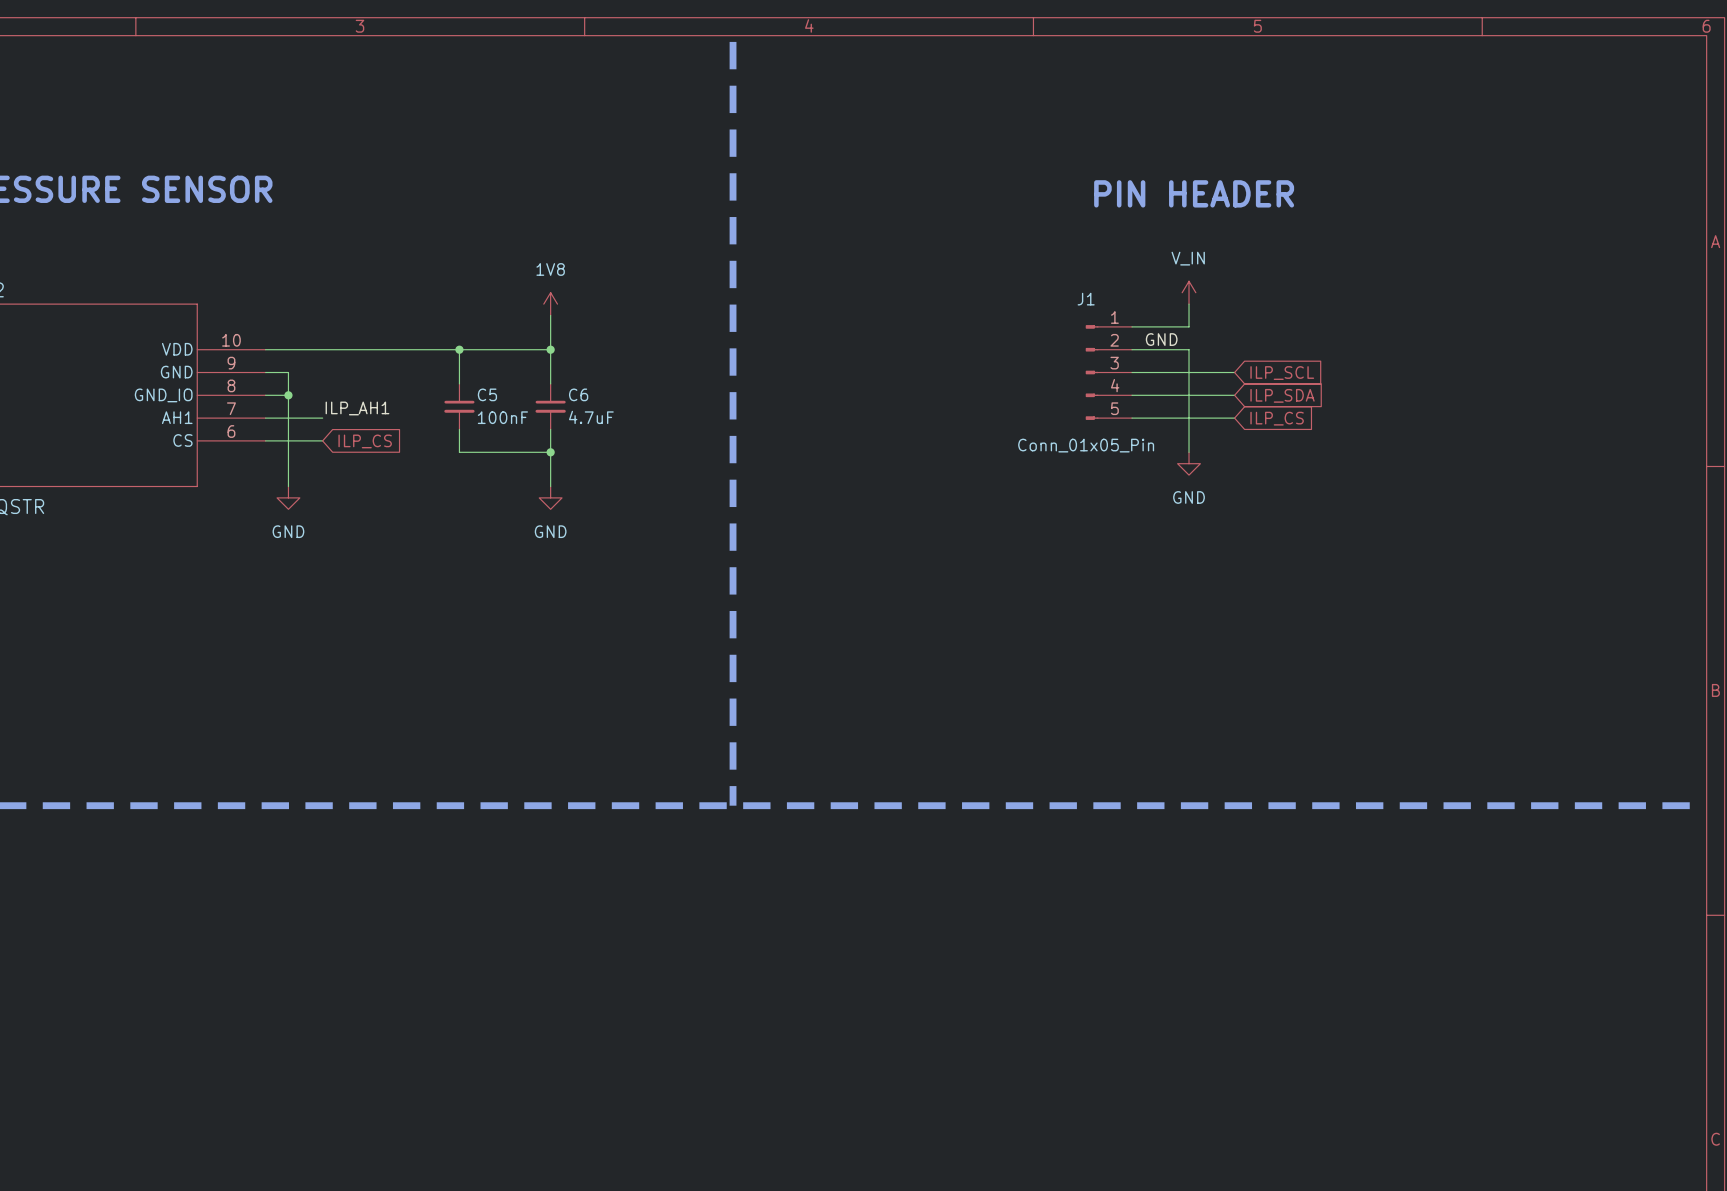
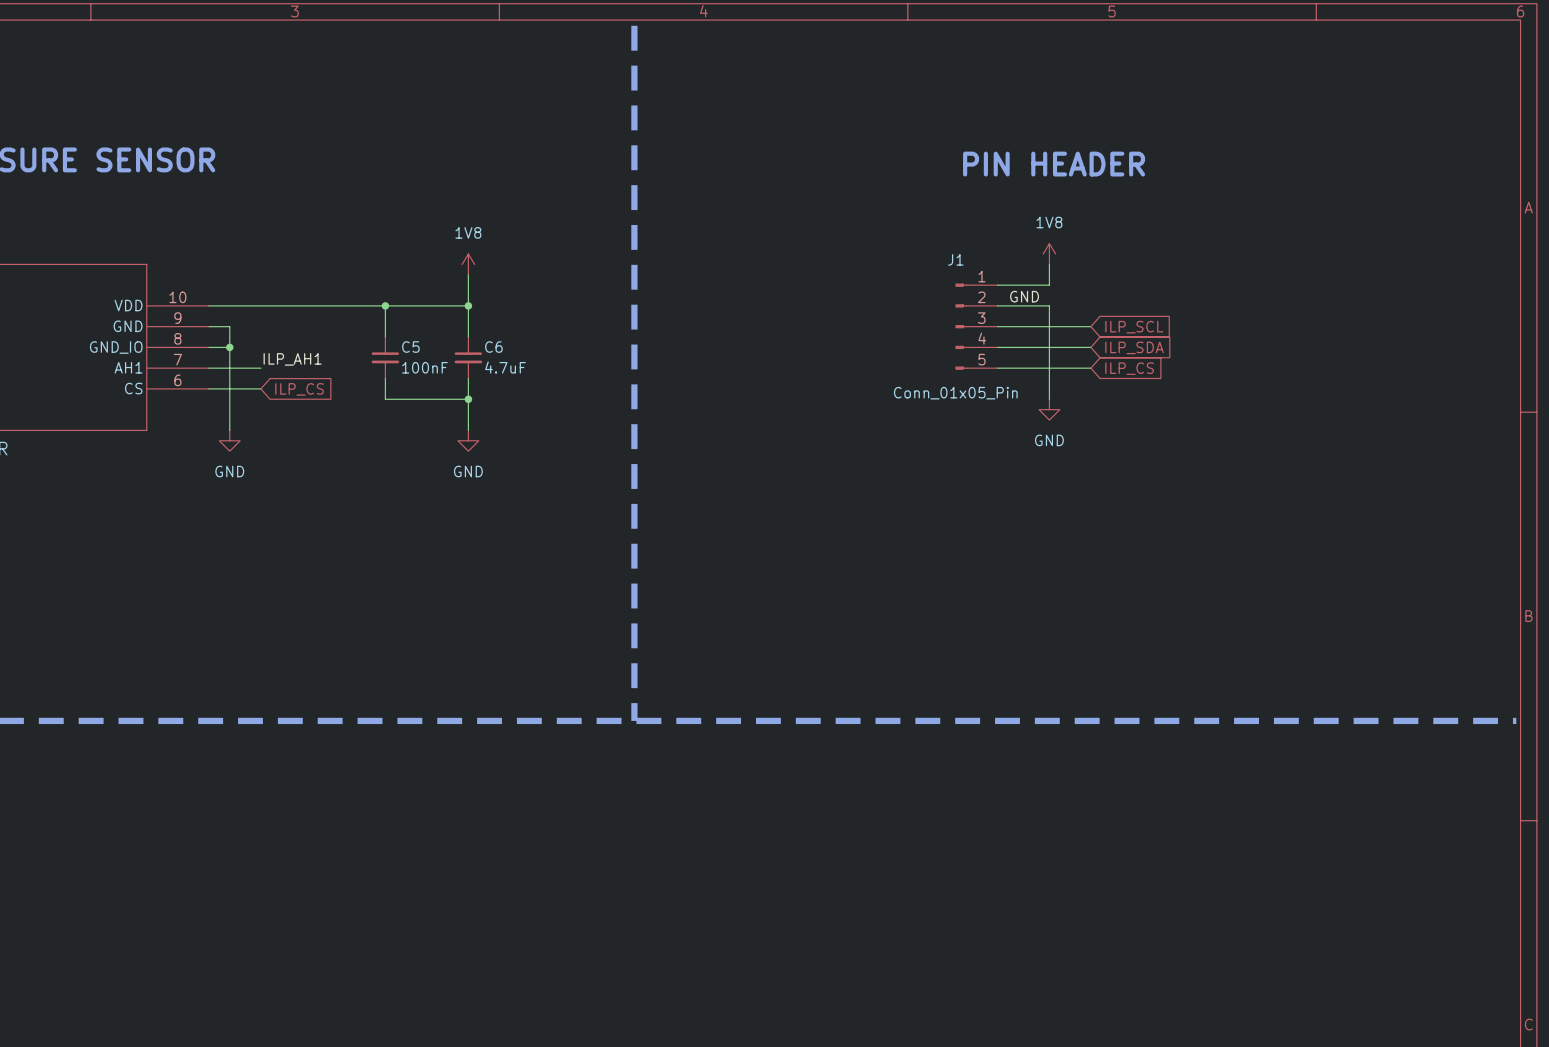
power symbol: V_IN (1189, 292) -> 1V8 (1049, 254)

